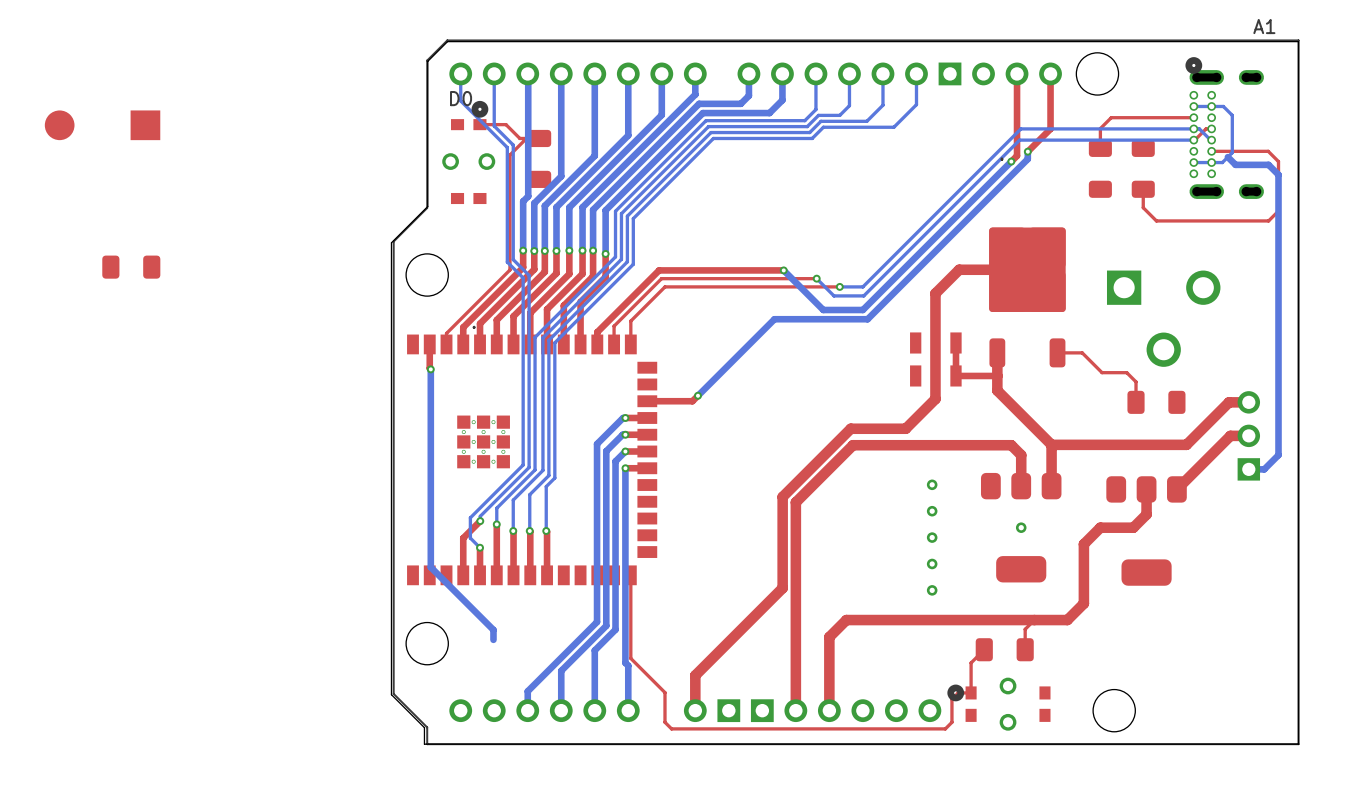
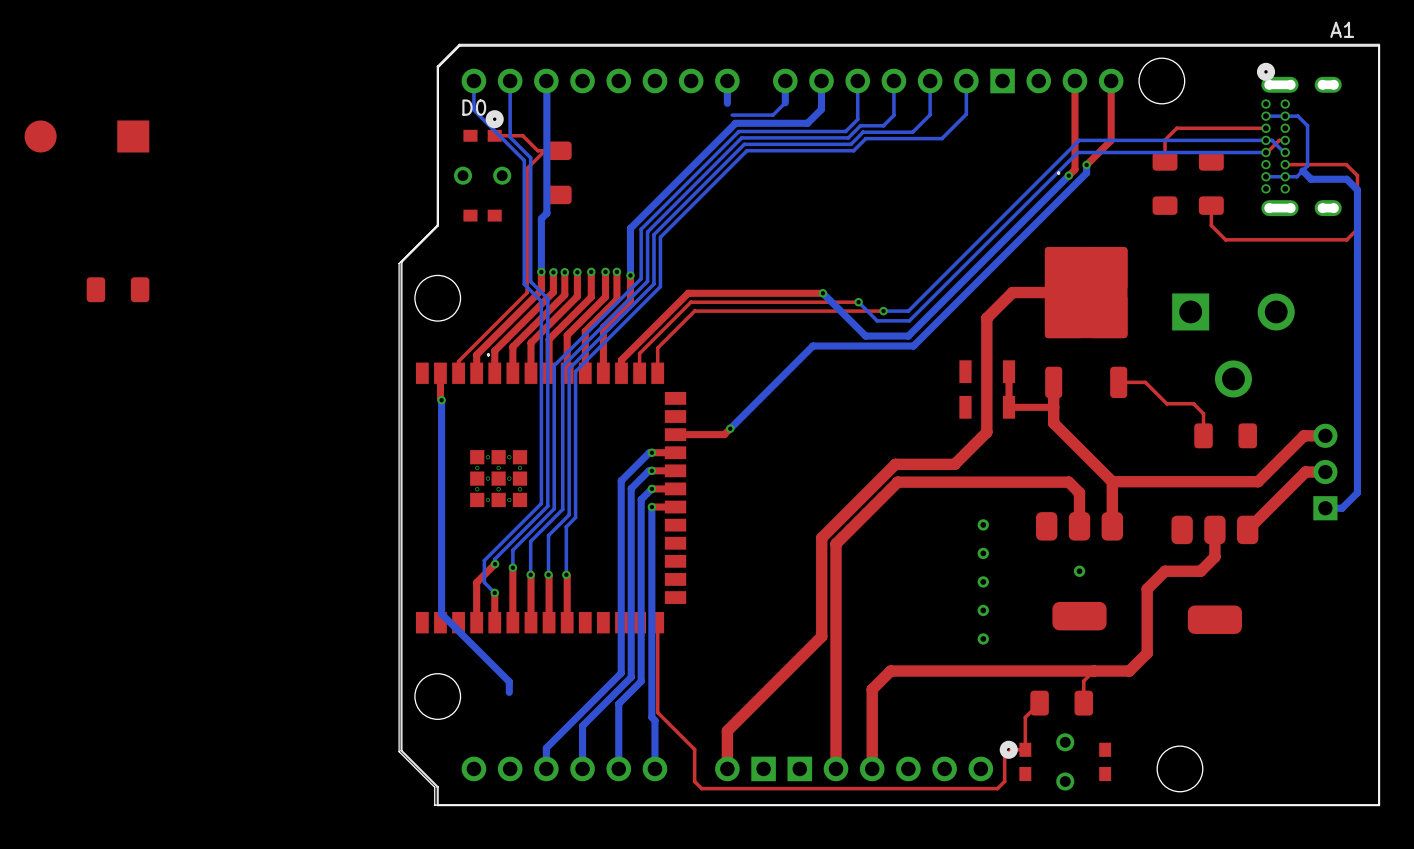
bottom track: (561, 73) (561, 176) (534, 203) (534, 251) -> none
bottom track: (594, 73) (594, 155) (544, 205) (544, 250) -> none
bottom track: (628, 73) (628, 135) (556, 207) (556, 250) -> none
bottom track: (661, 73) (661, 115) (569, 207) (569, 250) -> none
bottom track: (695, 94) (582, 207) (582, 250) -> none
bottom track: (748, 94) (740, 103) (699, 103) (593, 209) (593, 250) -> (785, 102) (773, 115) (732, 115)

